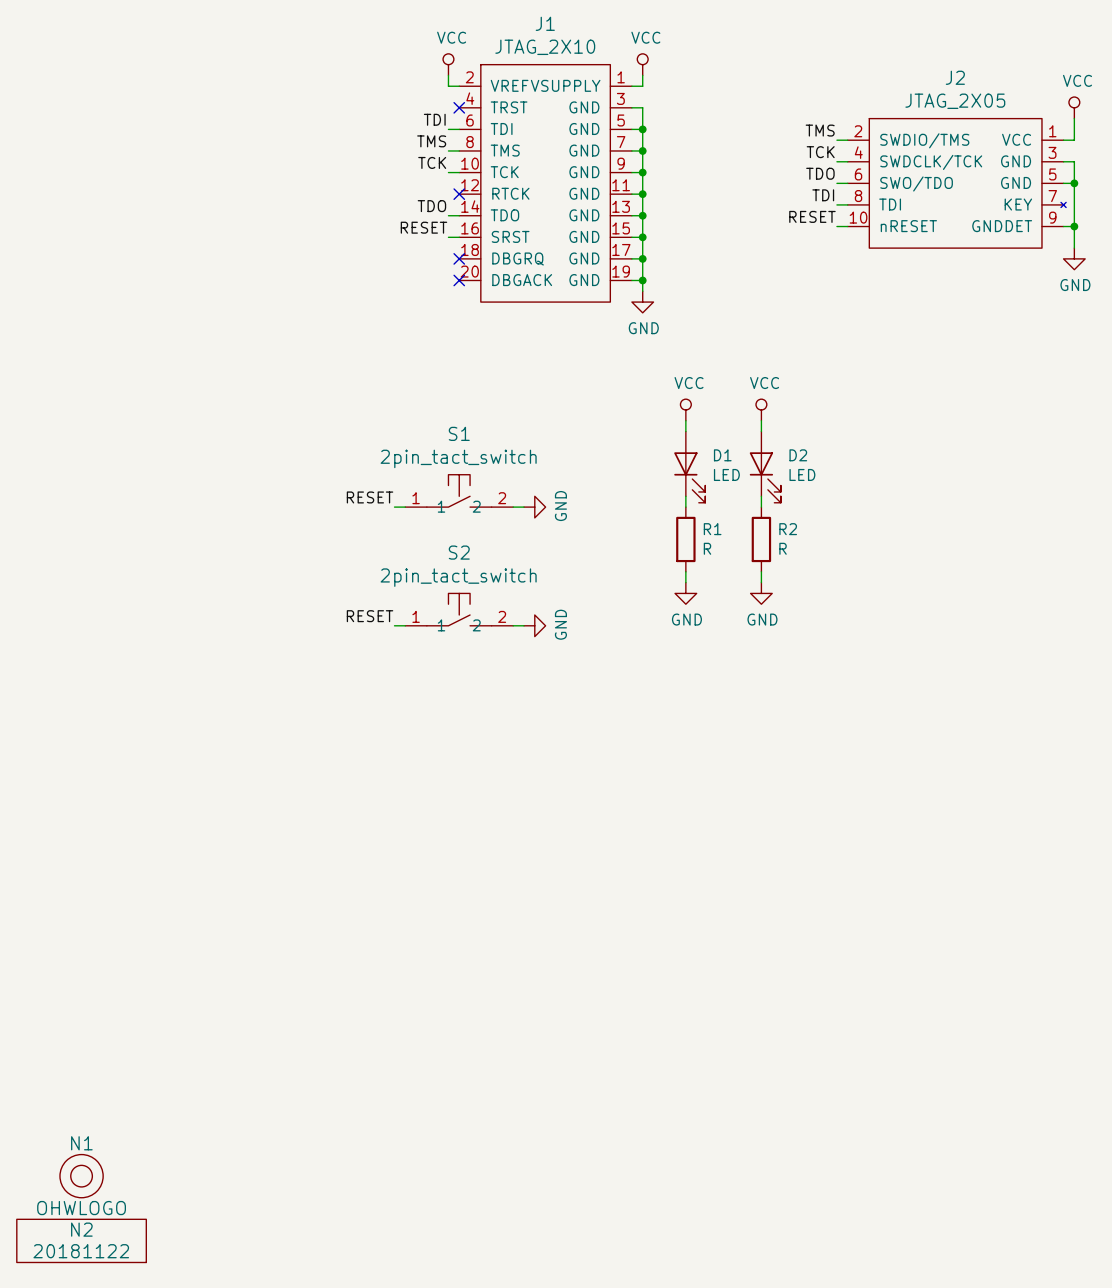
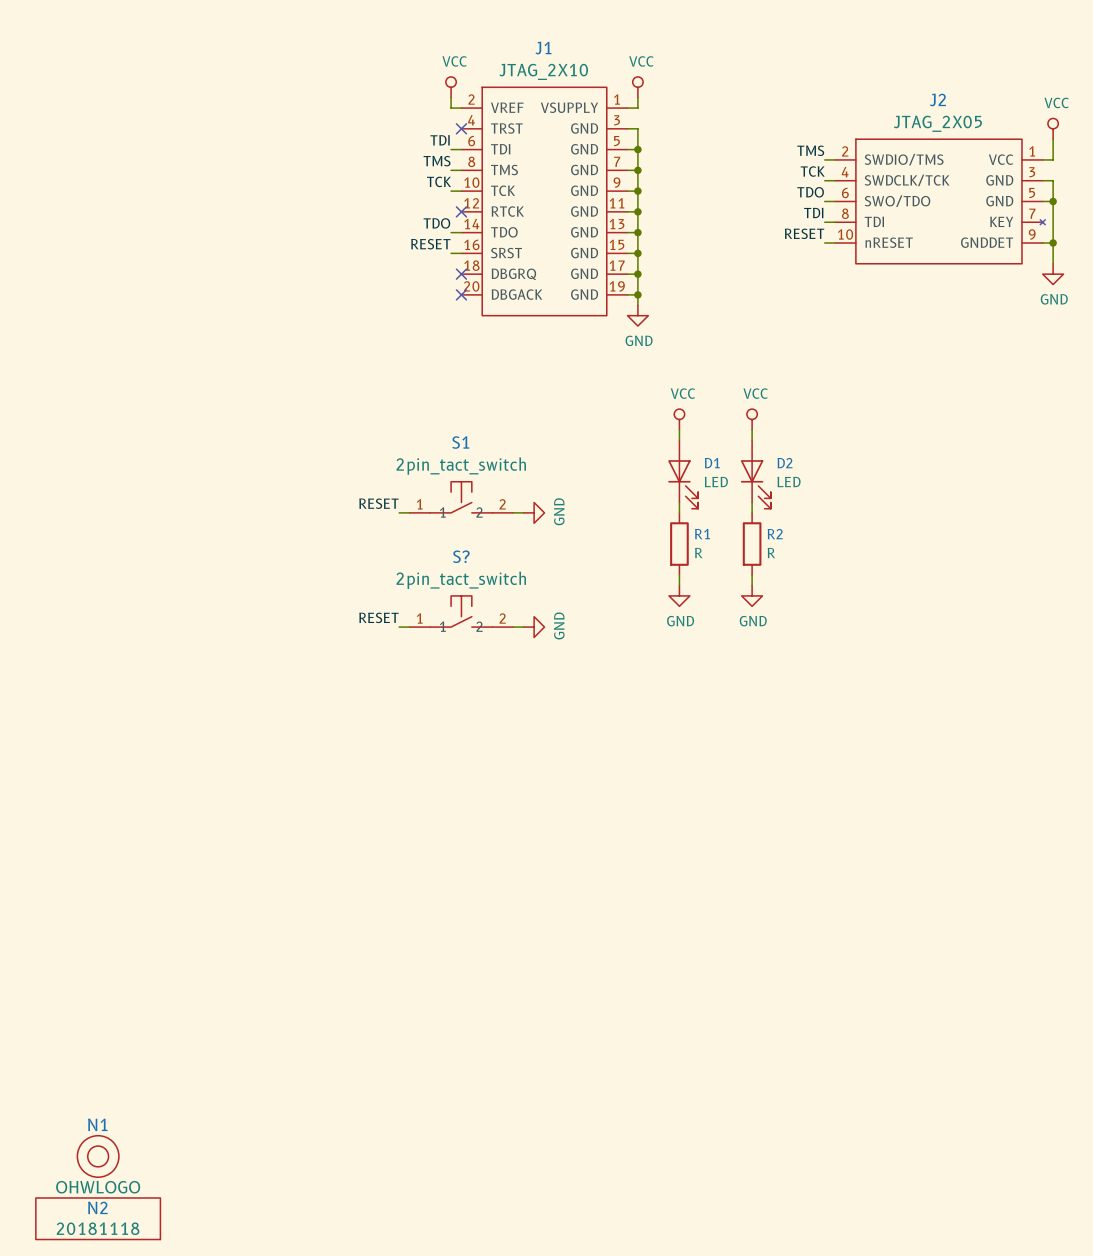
S2 name: S2 (459, 552) -> S? (461, 556)
N2 value: 20181122 (81, 1251) -> 20181118 (98, 1228)

